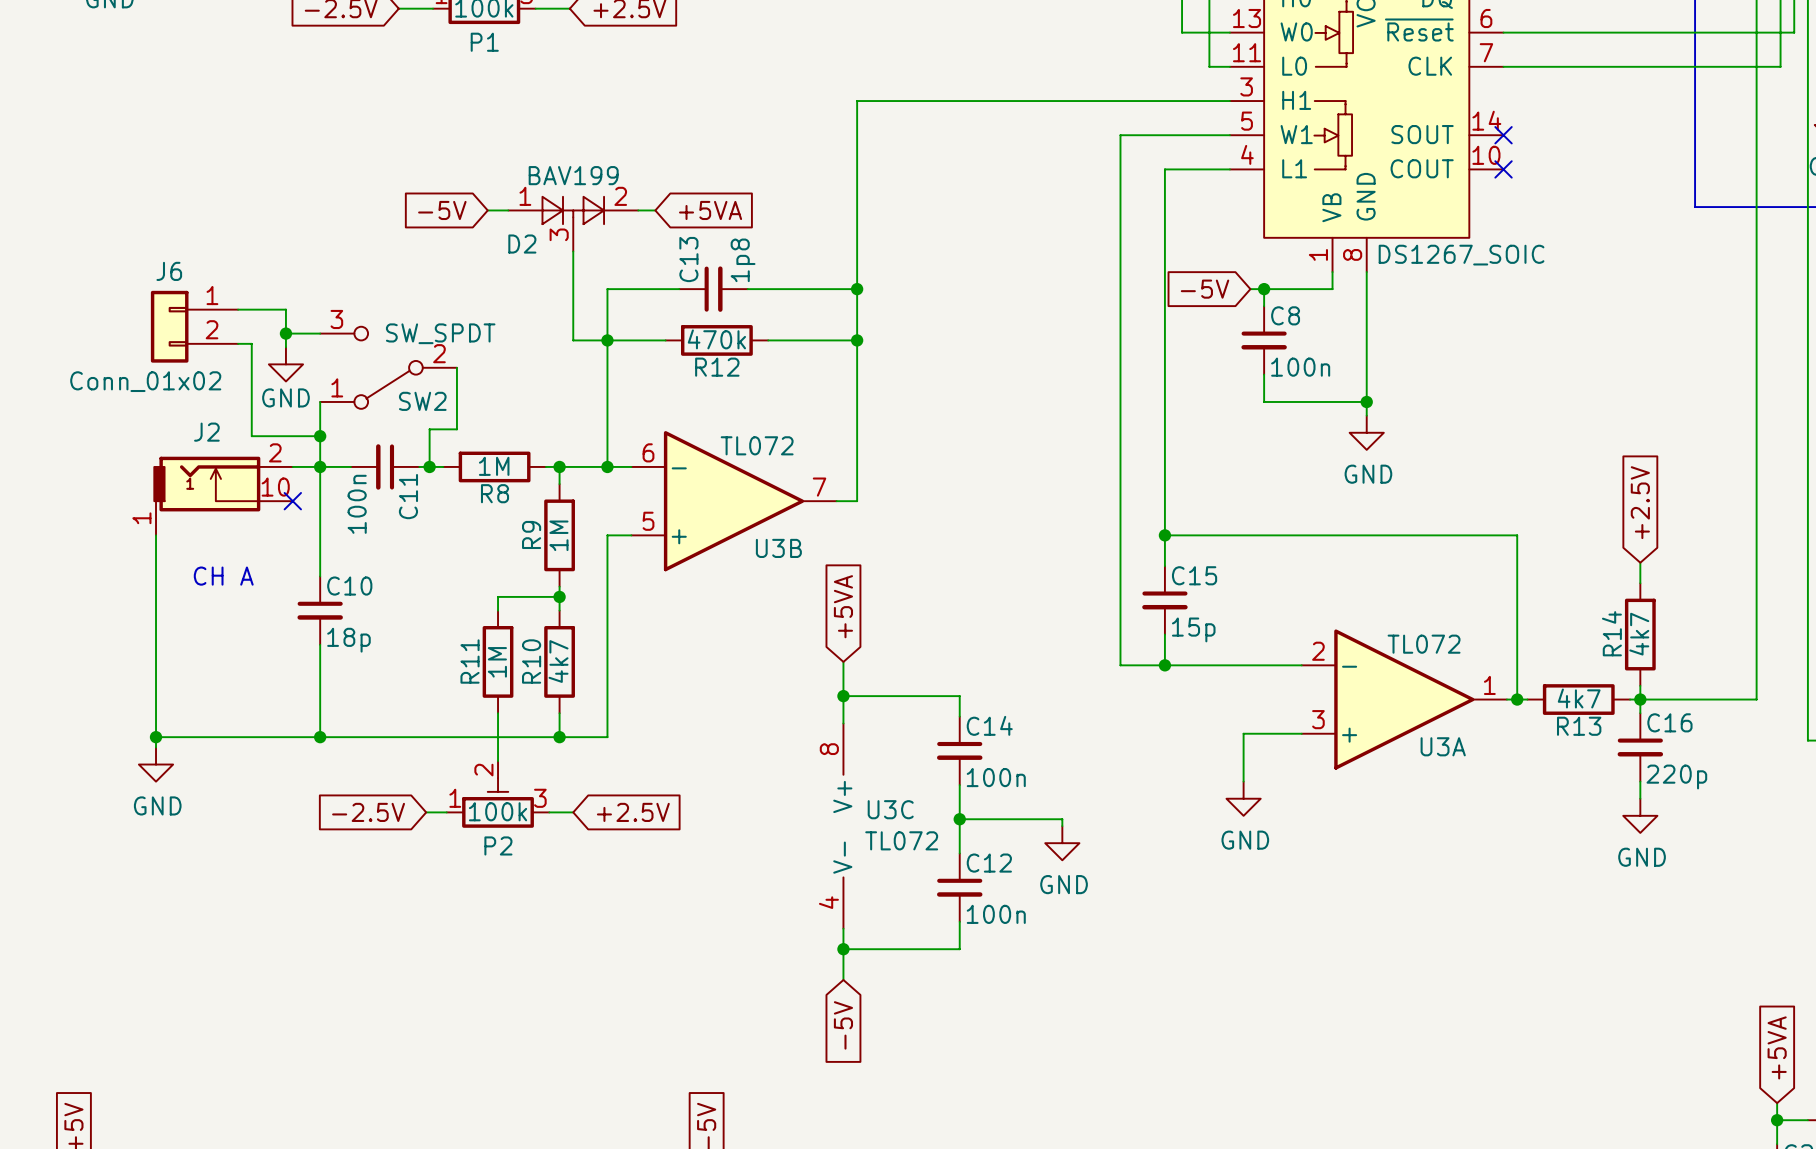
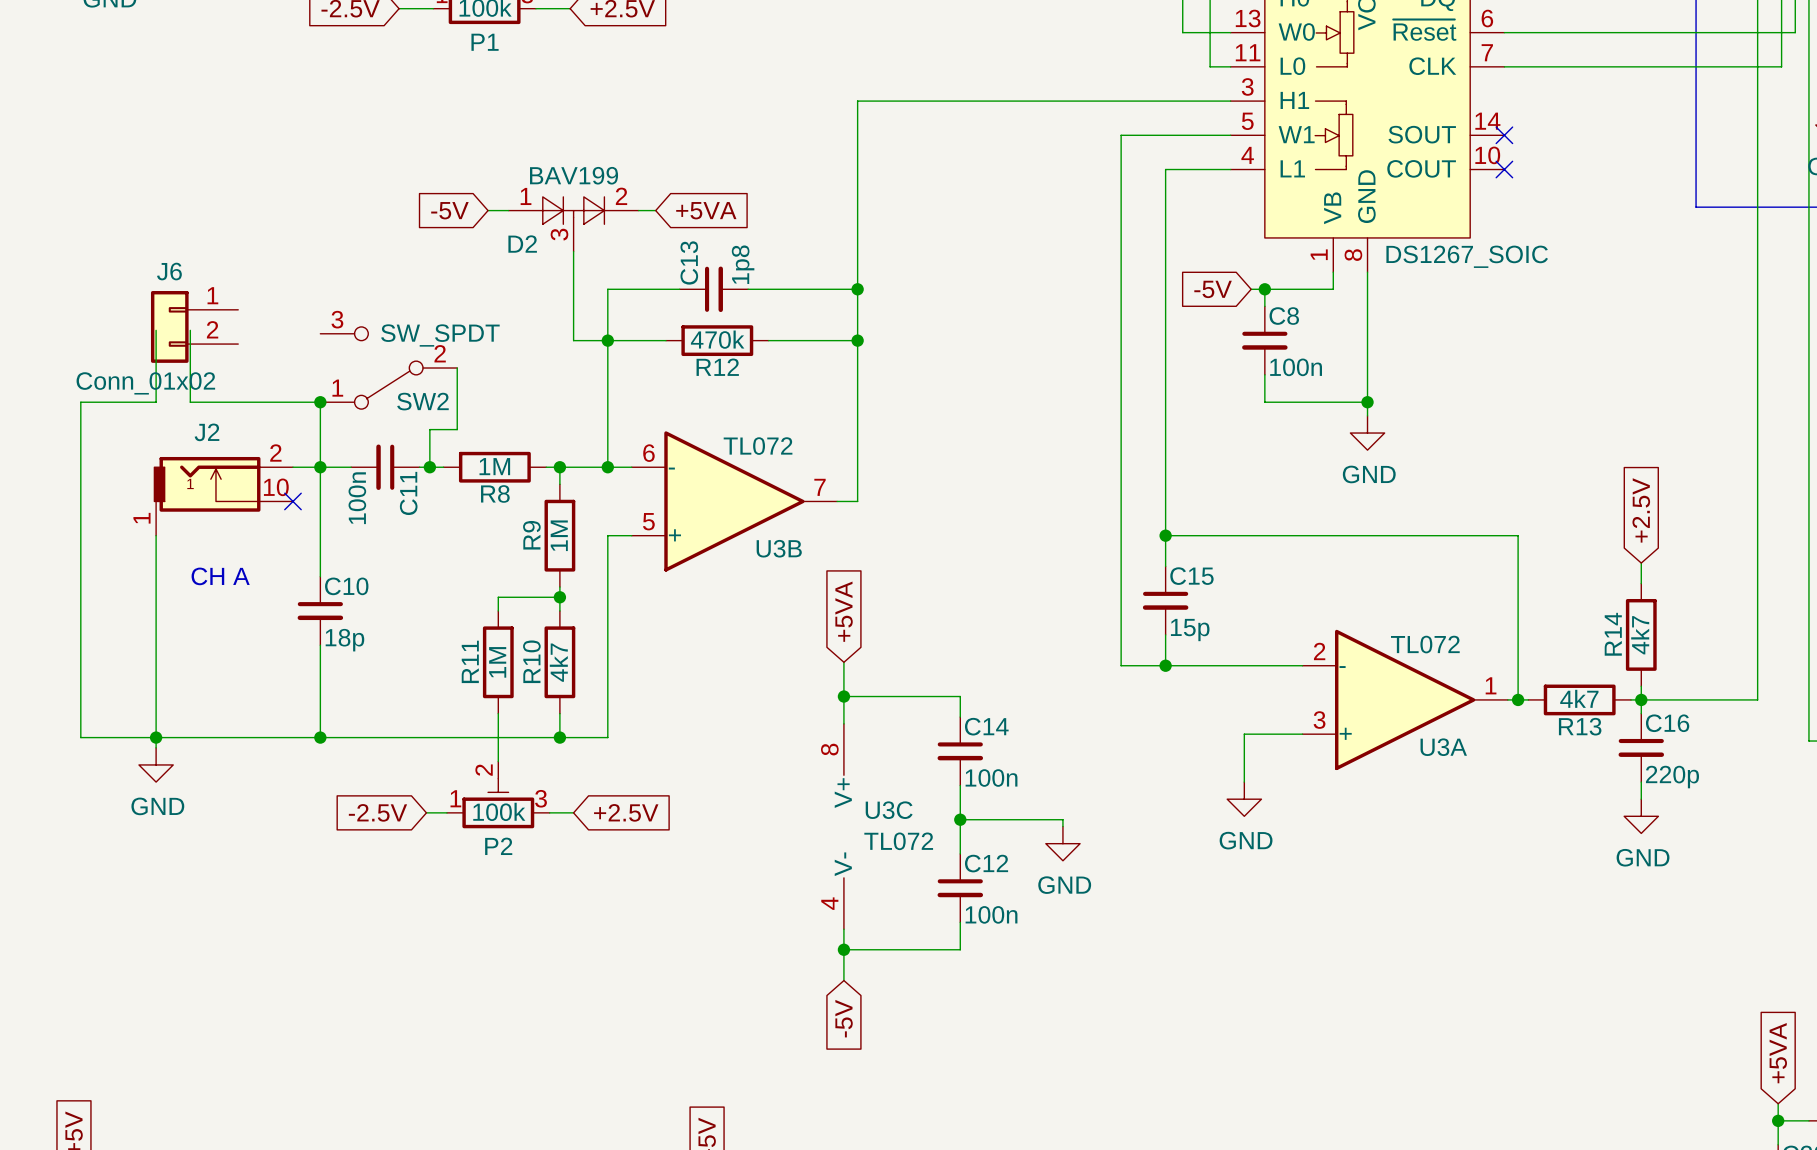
wire: (238, 309) (285, 309) (285, 347) -> none
wire: none -> (156, 330) (156, 402) (80, 402) (80, 737) (156, 737)
wire: none -> (190, 330) (190, 402) (320, 402)
wire: (285, 333) (320, 333) -> none
junction: (285, 333) -> none
wire: (238, 343) (251, 343) (251, 436) (320, 436) -> none
power symbol: GND (285, 364) -> none
junction position: (320, 436) -> (320, 402)

